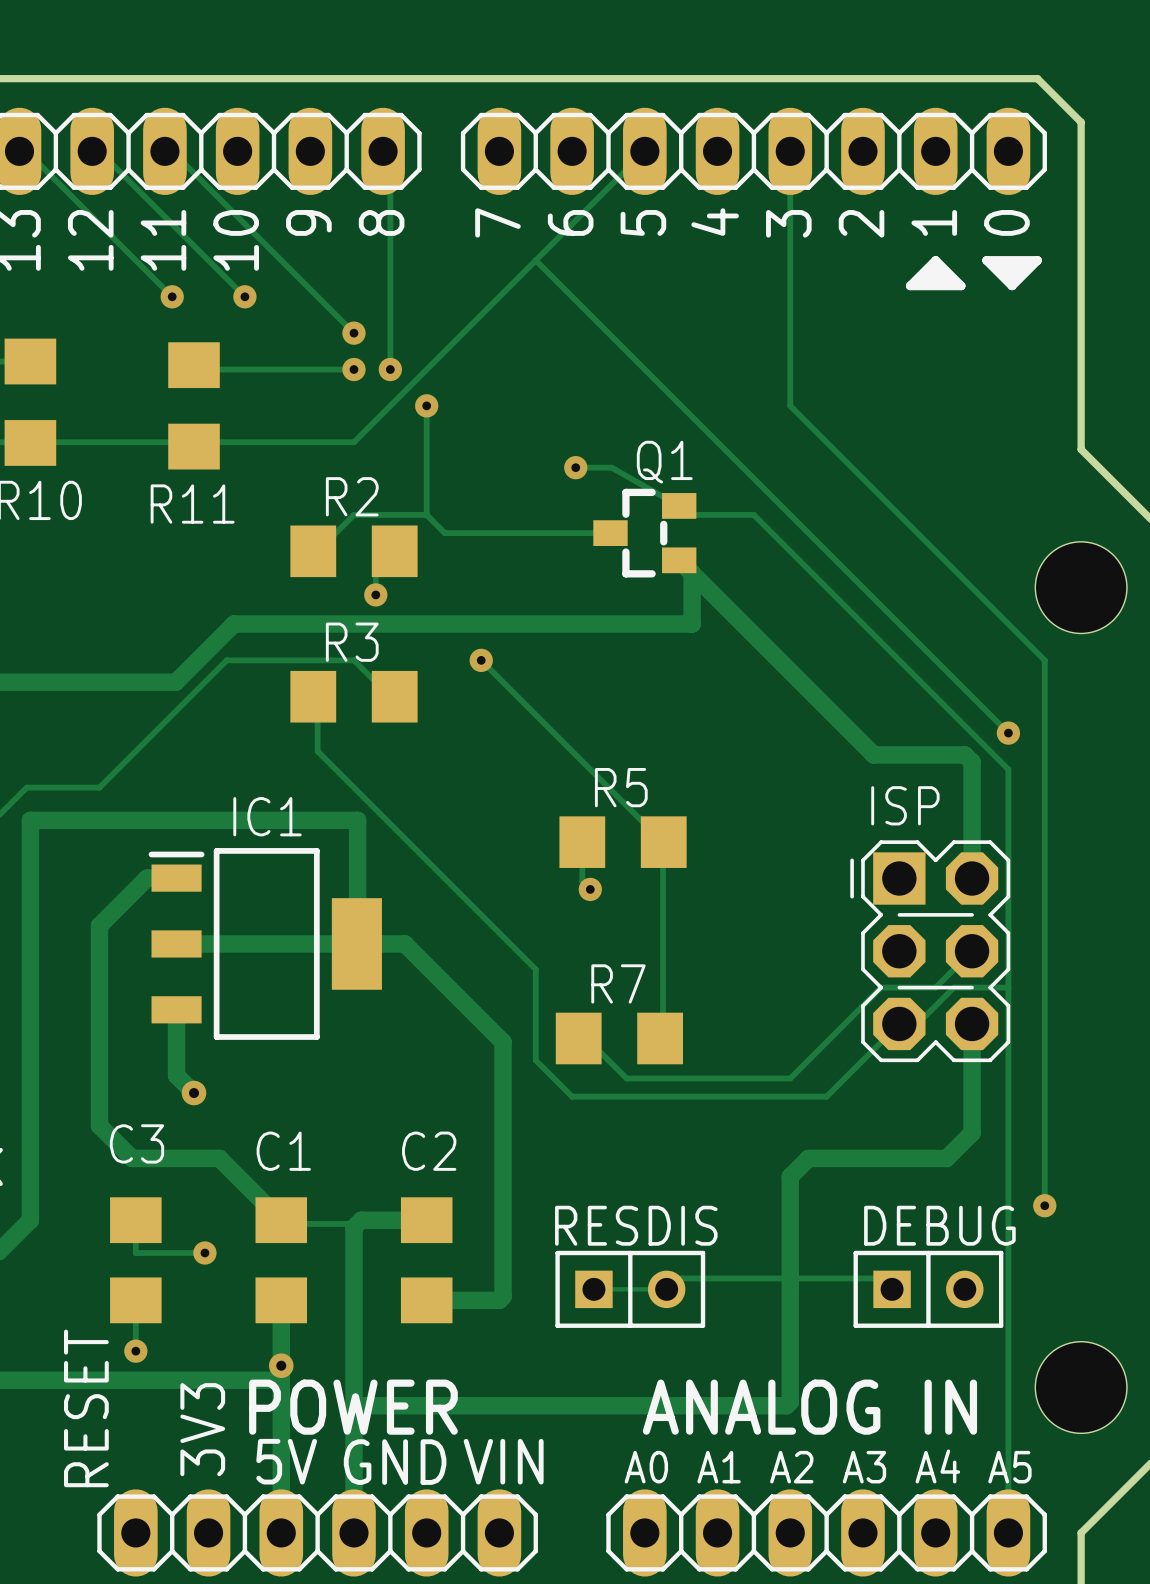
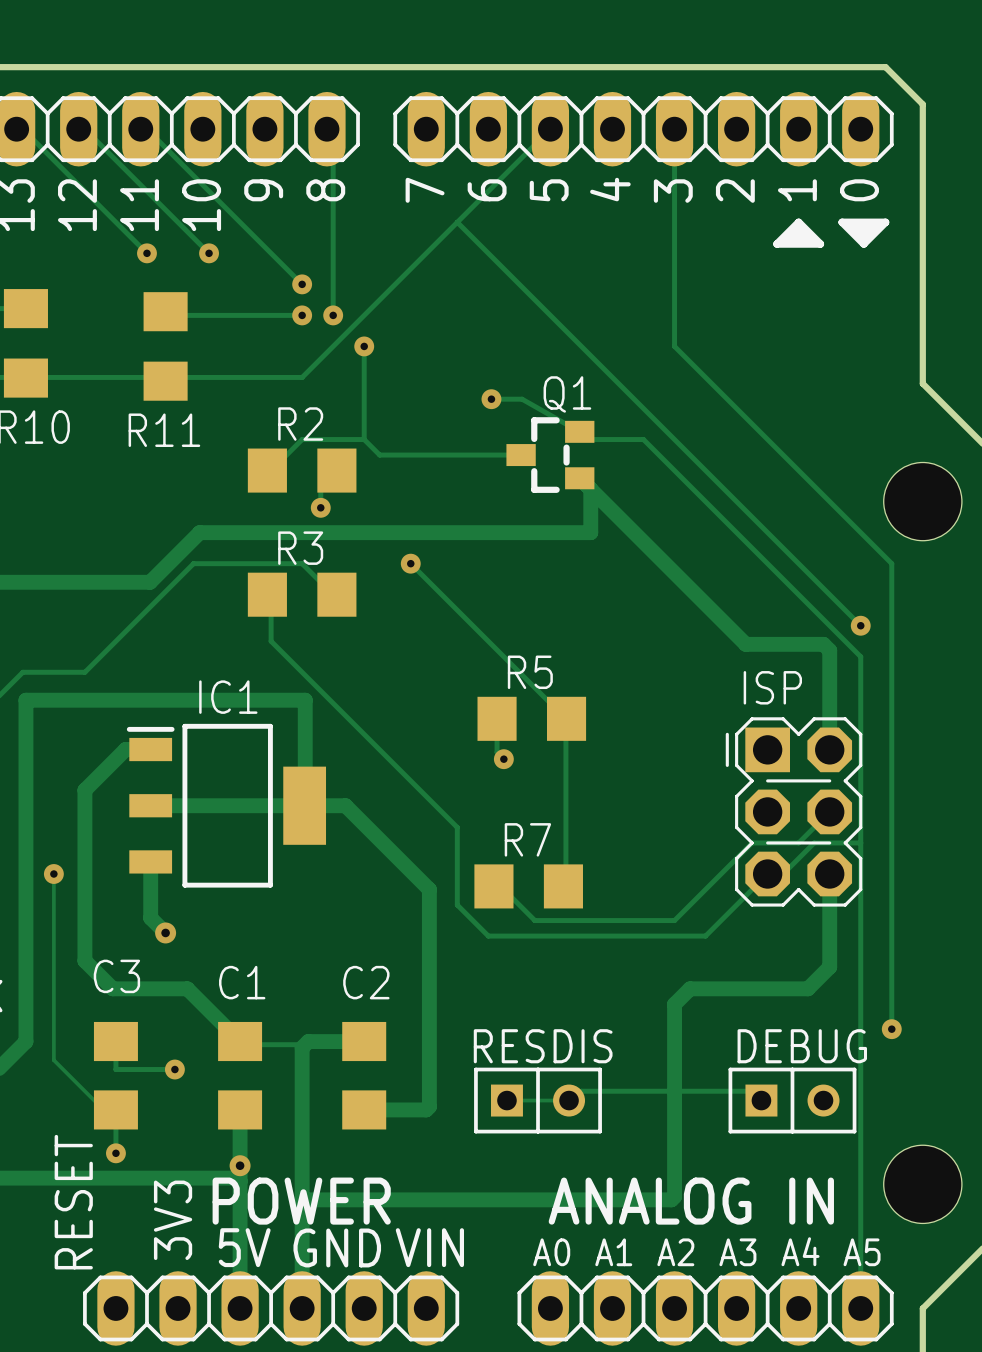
track: none -> (53, 874) (53, 1060) (115, 1122)
via: none -> (53, 874)

